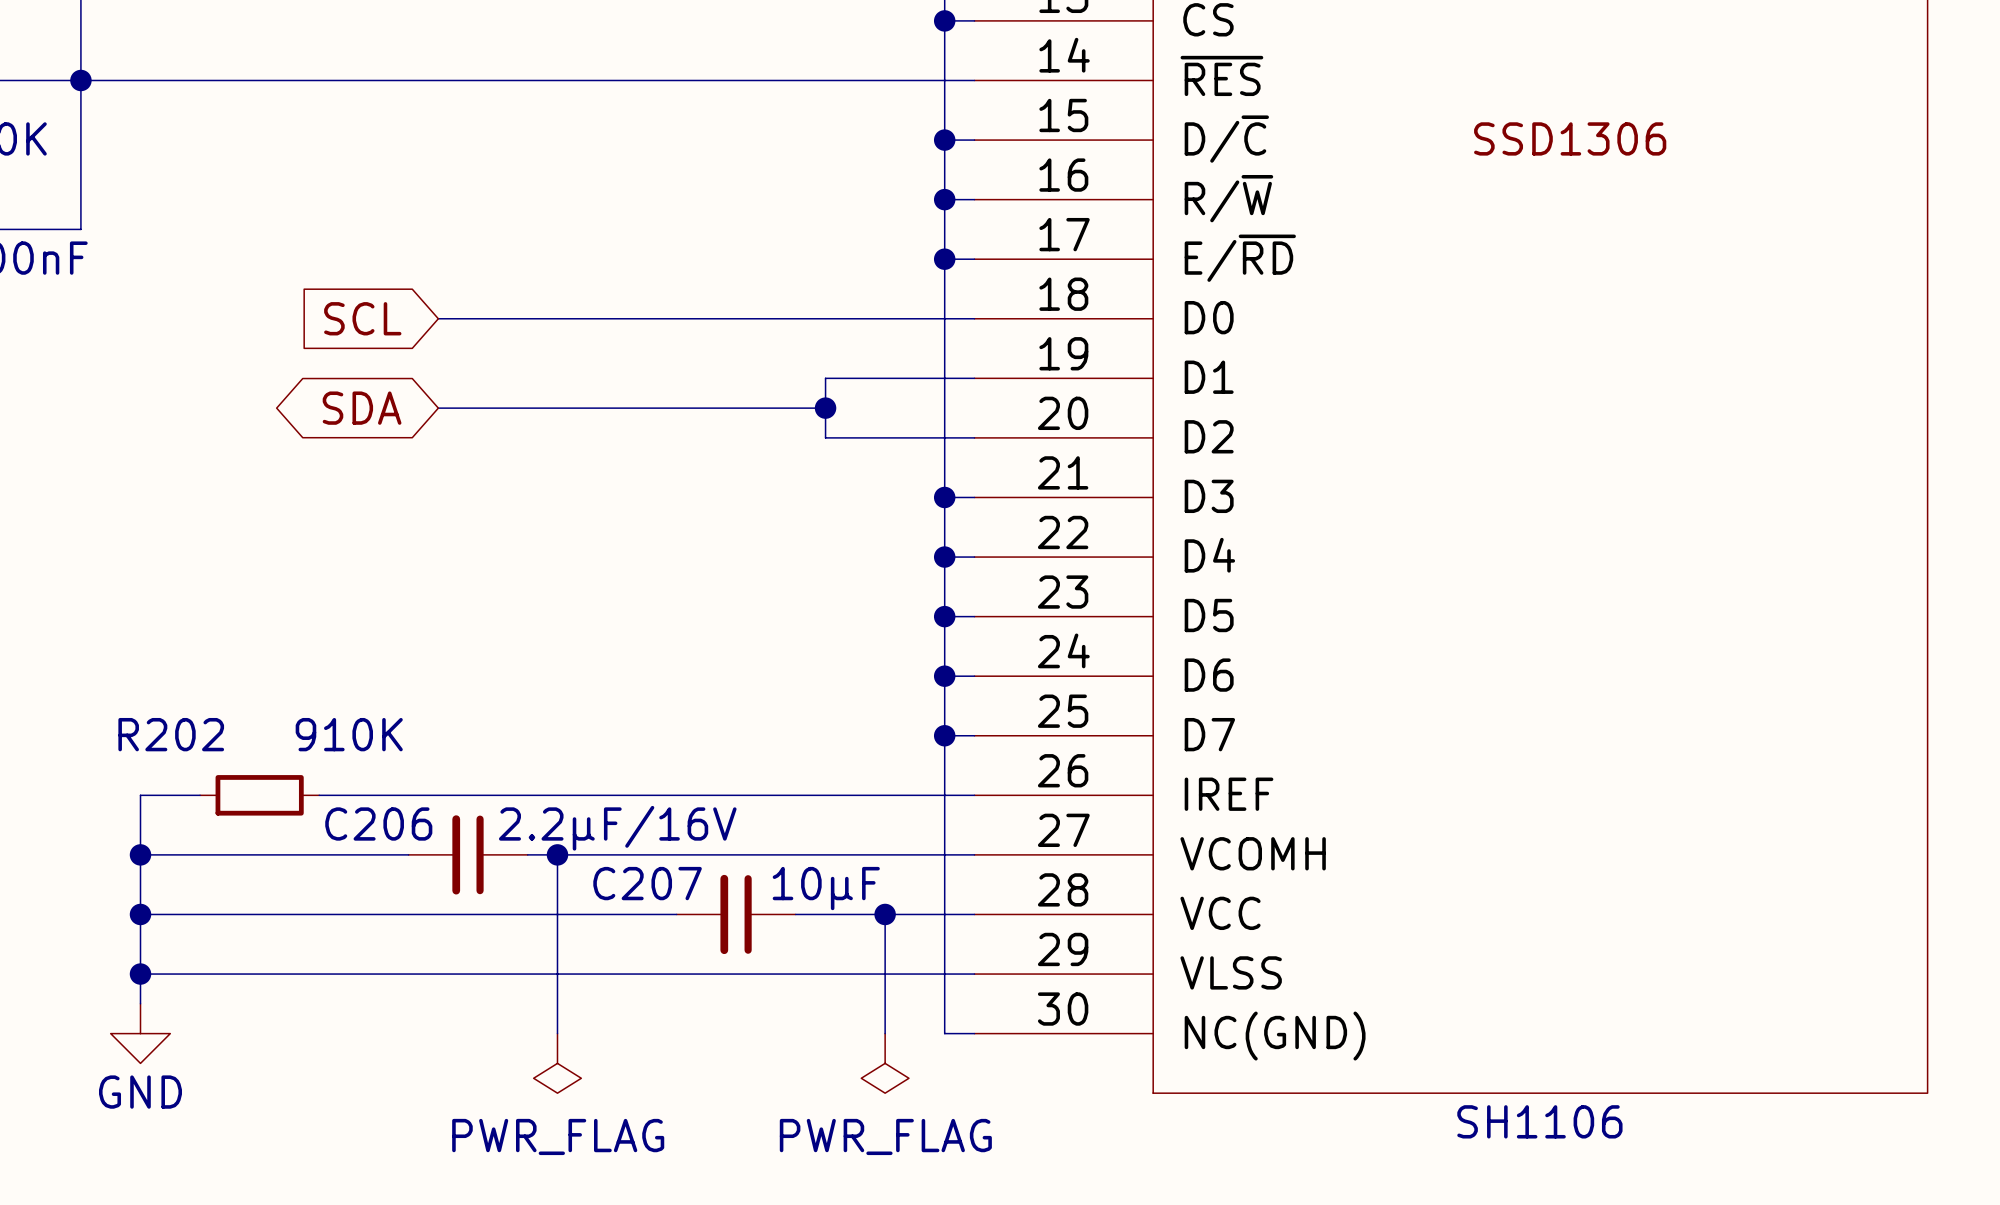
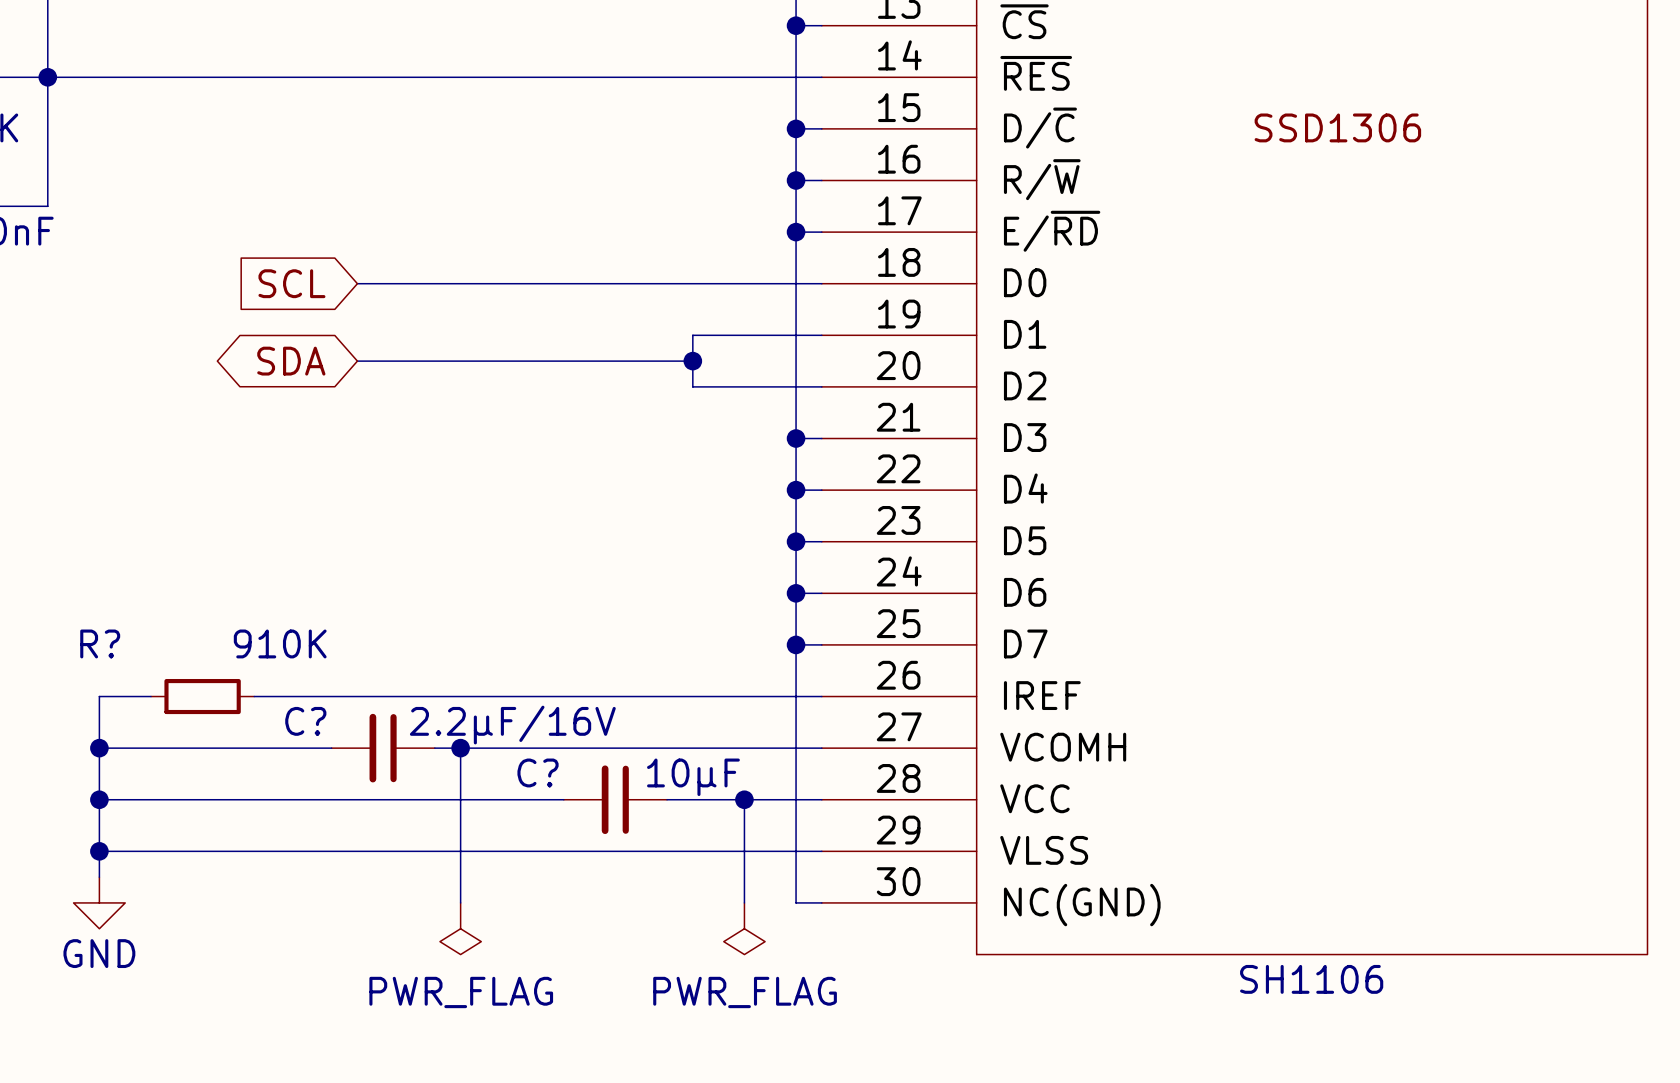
R202 name: R202 (171, 734) -> R? (100, 643)
C206 name: C206 (378, 824) -> C? (305, 721)
C207 name: C207 (647, 883) -> C? (538, 772)

